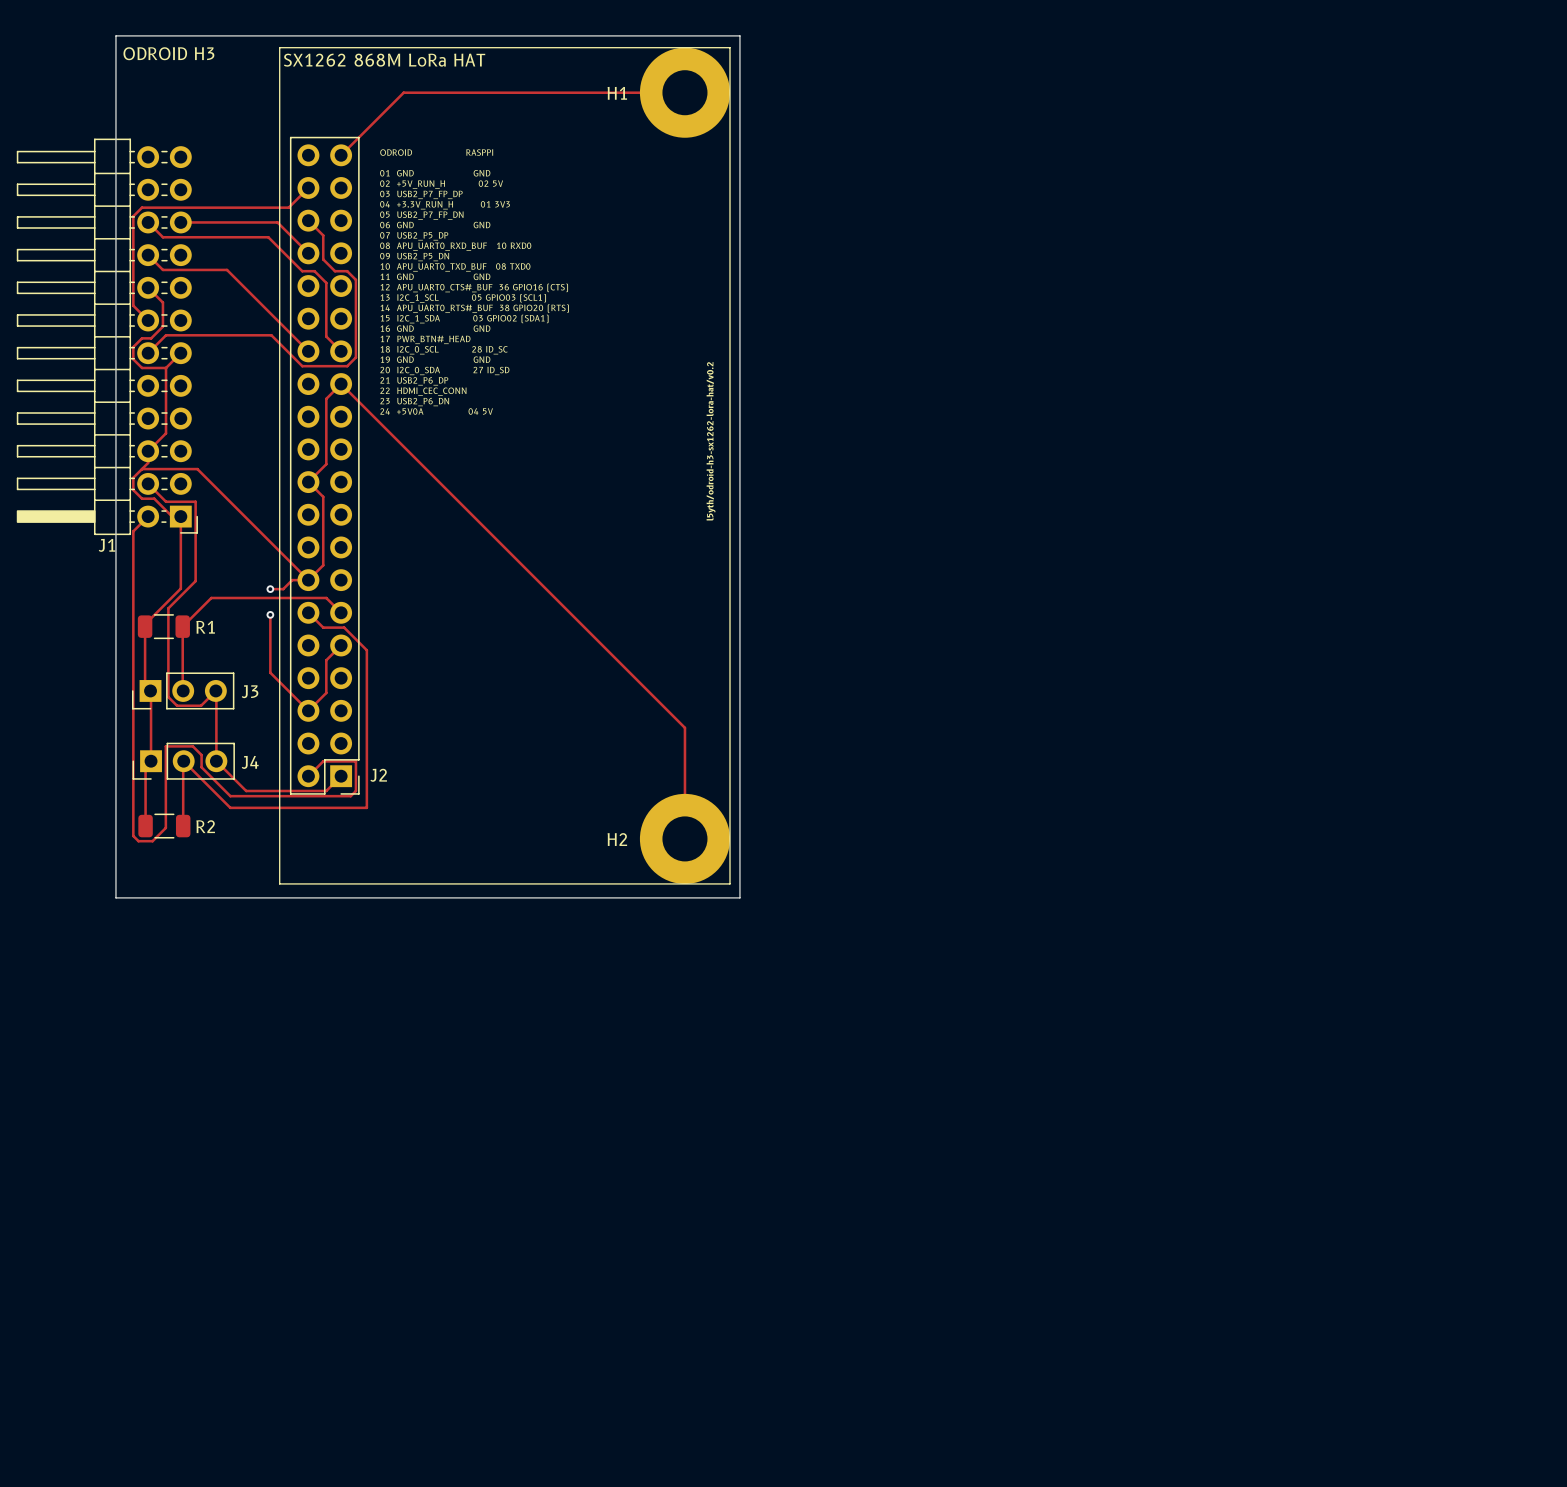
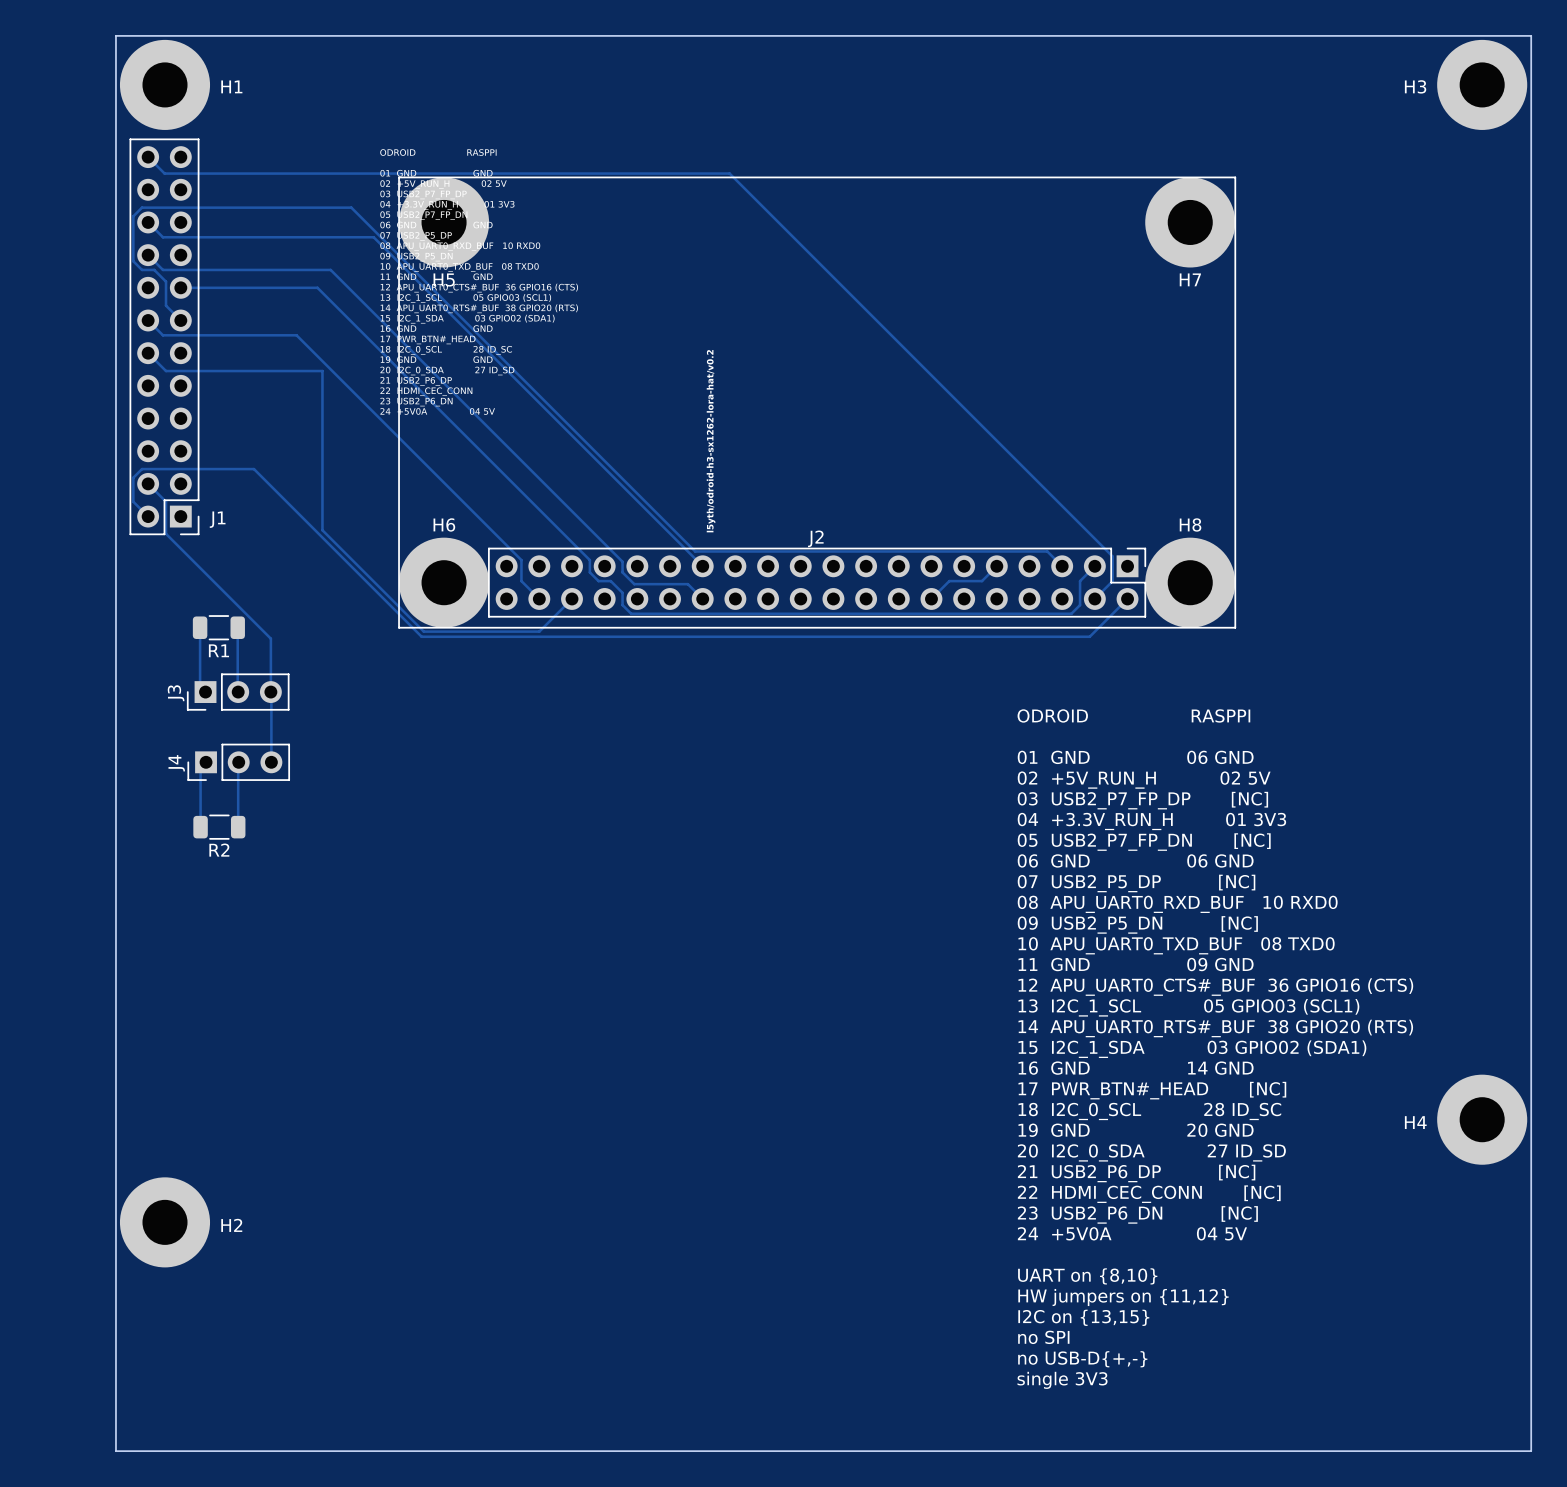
board edge: (739, 35) (739, 897) (115, 897) -> (739, 35) (1531, 35) (1531, 1451) (115, 1451) (115, 897)
line: (279, 47) (729, 47) (729, 883) (279, 883) (279, 47) -> none
text: ODROID H3 (168, 53) -> none
text: SX1262 868M LoRa HAT (384, 60) -> none
H3: none -> (1482, 84)
track: (684, 92) (403, 92) (341, 155) -> none
H1 position: (684, 92) -> (165, 84)
H1 name position: H1 (617, 93) -> H1 (231, 86)
J1 footprint: [16, 138, 198, 536] -> [129, 138, 200, 536]
track: none -> (148, 157) (164, 173) (729, 173) (1112, 556) (1112, 581) (1094, 598)
line: none -> (399, 177) (1235, 177) (1235, 627) (399, 627) (399, 177)
track: (308, 187) (288, 207) -> (1062, 566) (1047, 551) (695, 551) (351, 207) (288, 207)
track: (308, 220) (323, 235) (323, 259) (334, 271) (347, 271) (355, 279) (355, 357) (347, 366) (302, 366) (271, 335) -> (539, 598) (521, 581) (521, 560) (296, 335) (271, 335)
track: (180, 222) (277, 222) (308, 253) -> none
H5: none -> (444, 222)
H7: none -> (1190, 222)
track: (268, 237) (302, 271) (314, 271) (326, 282) (326, 336) (341, 351) -> (268, 237) (373, 237) (702, 566)
track: (133, 261) (133, 305) (148, 320) -> (133, 261) (142, 269) (154, 269) (166, 281) (166, 305) (180, 320)
track: (227, 269) (308, 351) -> (227, 269) (330, 269) (622, 561) (622, 572) (634, 584) (687, 584) (702, 598)
track: (148, 287) (162, 302) (162, 326) (151, 338) (142, 338) (133, 347) (133, 359) (142, 367) (166, 367) -> none
track: none -> (180, 287) (317, 287) (589, 560) (589, 572) (598, 581) (610, 581) (622, 592) (622, 605) (631, 613) (1071, 613) (1080, 605) (1080, 581) (1094, 566)
track: (166, 335) (148, 353) -> (166, 335) (162, 335) (148, 320)
track: none -> (148, 353) (166, 371) (322, 371) (322, 530) (423, 631) (539, 631) (572, 598)
track: (180, 353) (166, 367) -> none
track: (166, 367) (166, 433) (148, 451) (148, 462) (142, 469) -> none
J2 rotation: 0° (324, 465) -> 90° counterclockwise (817, 582)
J2 position: (324, 465) -> (817, 582)
track: (197, 469) (308, 580) -> (197, 469) (253, 469) (421, 636) (1089, 636) (1127, 598)
track: (133, 490) (142, 498) (154, 498) (172, 516) (180, 516) (180, 588) (145, 624) (145, 685) (150, 690) (151, 694) (151, 761) (145, 766) (145, 826) -> (133, 490) (133, 501) (148, 516)
track: (166, 501) (195, 501) (195, 581) (168, 608) (168, 697) (177, 705) (201, 705) (216, 691) (216, 761) (246, 791) (326, 791) (341, 776) -> (166, 501) (166, 533) (270, 638) (271, 762)
track: (148, 516) (133, 531) (133, 835) (138, 841) (152, 841) (165, 827) (165, 746) (192, 746) (201, 755) (201, 767) (230, 796) (350, 796) (355, 791) (355, 761) (323, 761) (308, 776) -> none
J1 name position: J1 (107, 545) -> J1 (217, 519)
track: none -> (996, 566) (982, 581) (949, 581) (931, 598)
track: (308, 580) (292, 580) (283, 589) (270, 589) -> none
track: (308, 580) (323, 565) (323, 496) (308, 482) (326, 464) (326, 398) (341, 384) (684, 727) (684, 838) -> none
H6: none -> (444, 582)
H8: none -> (1190, 582)
via: (270, 589) -> none
track: (308, 612) (323, 627) (344, 627) (366, 650) (366, 807) (230, 807) (183, 761) (183, 826) -> none
track: (341, 612) (326, 598) (211, 598) (182, 626) (183, 690) (186, 685) -> none
track: (270, 614) (270, 672) (308, 710) (326, 692) (326, 660) (341, 645) -> none
via: (270, 614) -> none
R1 position: (163, 626) -> (218, 627)
track: none -> (200, 627) (200, 686) (205, 692)
R1 name position: R1 (205, 627) -> R1 (218, 650)
track: none -> (237, 627) (238, 692)
J3 position: (183, 690) -> (238, 692)
J3 name rotation: 0° (250, 691) -> 90° counterclockwise (176, 693)
J3 name position: J3 (250, 691) -> J3 (176, 693)
text: none -> ODROID RASPPI (1133, 715)
text: none -> 01 GND 06 GND (1135, 757)
J4 position: (183, 761) -> (238, 762)
track: none -> (206, 762) (200, 767) (200, 827)
track: none -> (238, 762) (238, 827)
J4 name rotation: 0° (250, 762) -> 90° counterclockwise (176, 763)
J4 name position: J4 (250, 762) -> J4 (176, 763)
J2 name position: J2 (378, 775) -> J2 (815, 538)
text: none -> 02 +5V_RUN_H 02 5V (1144, 780)
text: none -> 03 USB2_P7_FP_DP [NC] (1142, 800)
text: none -> 04 +3.3V_RUN_H 01 3V3 (1151, 821)
R2 position: (164, 826) -> (219, 827)
R2 name position: R2 (205, 826) -> R2 (219, 850)
H2 position: (684, 838) -> (165, 1222)
H2 name position: H2 (617, 839) -> H2 (231, 1225)
text: none -> 05 USB2_P7_FP_DN [NC] (1144, 842)
text: none -> 06 GND 06 GND (1135, 860)
text: none -> 07 USB2_P5_DP [NC] (1136, 883)
text: none -> 08 APU_UART0_RXD_BUF 10 RXD0 (1177, 904)
text: none -> 09 USB2_P5_DN [NC] (1137, 924)
text: none -> 10 APU_UART0_TXD_BUF 08 TXD0 (1176, 945)
text: none -> 11 GND 09 GND (1136, 964)
text: none -> 12 APU_UART0_CTS#_BUF 36 GPIO16 (CTS) (1215, 987)
text: none -> 13 I2C_1_SCL 05 GPIO03 (SCL1) (1188, 1007)
text: none -> 14 APU_UART0_RTS#_BUF 38 GPIO20 (RTS) (1215, 1028)
text: none -> 15 I2C_1_SDA 03 GPIO02 (SDA1) (1192, 1049)
text: none -> 16 GND 14 GND (1136, 1068)
text: none -> 17 PWR_BTN#_HEAD [NC] (1152, 1090)
text: none -> 18 I2C_0_SCL 28 ID_SC (1149, 1111)
H4: none -> (1482, 1119)
text: none -> 19 GND 20 GND (1136, 1130)
text: none -> 20 I2C_0_SDA 27 ID_SD (1151, 1152)
text: none -> 21 USB2_P6_DP [NC] (1136, 1173)
text: none -> 22 HDMI_CEC_CONN [NC] (1149, 1194)
text: none -> 23 USB2_P6_DN [NC] (1137, 1214)
text: none -> 24 +5V0A 04 5V (1132, 1233)
text: none -> UART on {8,10} (1087, 1276)
text: none -> HW jumpers on {11,12} (1123, 1297)
text: none -> I2C on {13,15} (1083, 1317)
text: none -> no SPI (1043, 1337)
text: none -> no USB-D{+,-} (1082, 1359)
text: none -> single 3V3 (1062, 1380)

